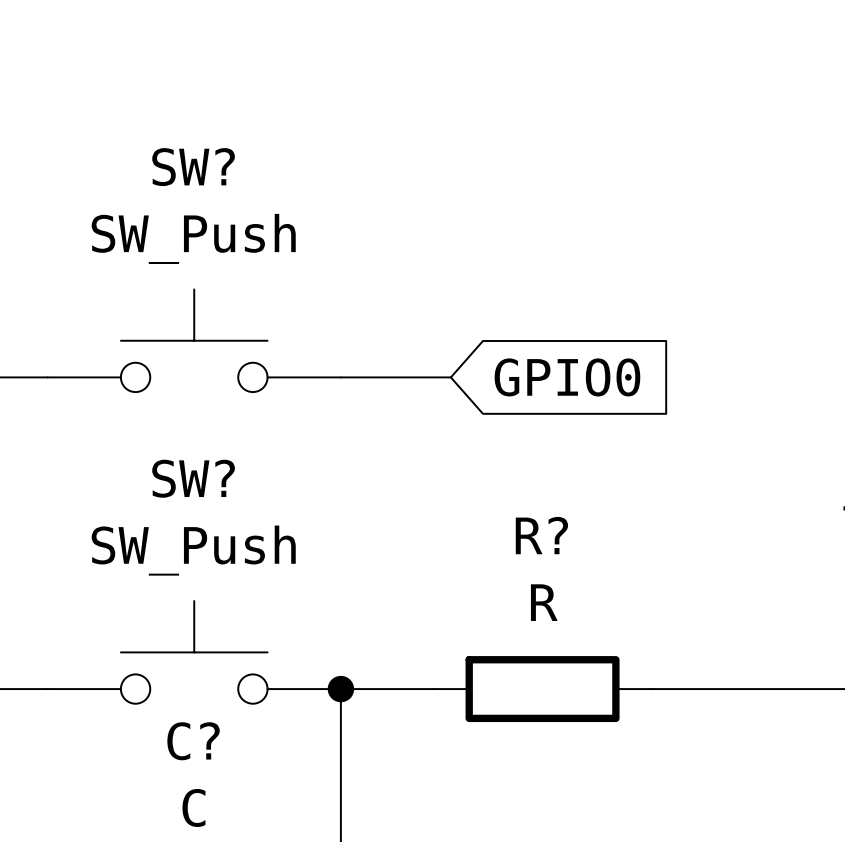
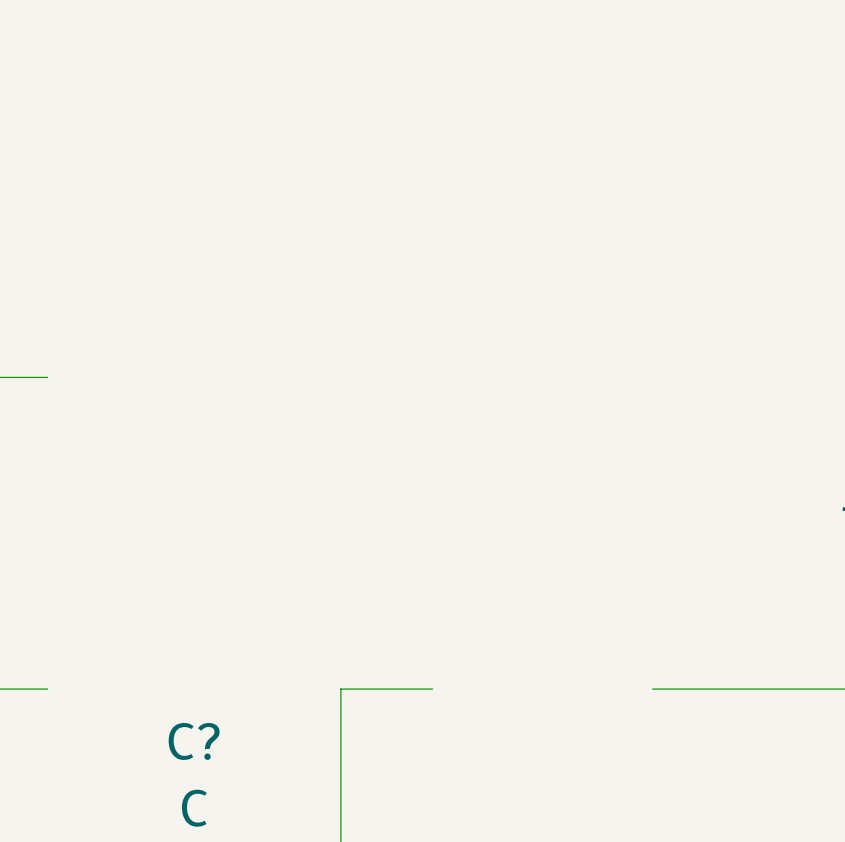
SW?: SW_Push (194, 340) -> none
wire: (340, 377) (450, 377) -> none
global label: GPIO0 (567, 377) -> none
SW?: SW_Push (194, 652) -> none
junction: (340, 689) -> none
R?: R (542, 689) -> none

